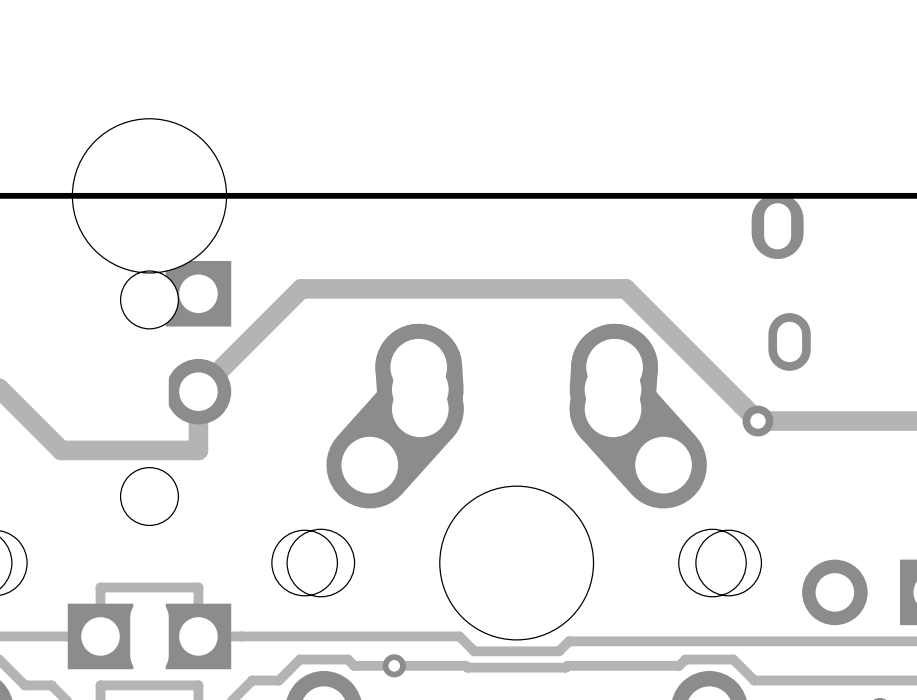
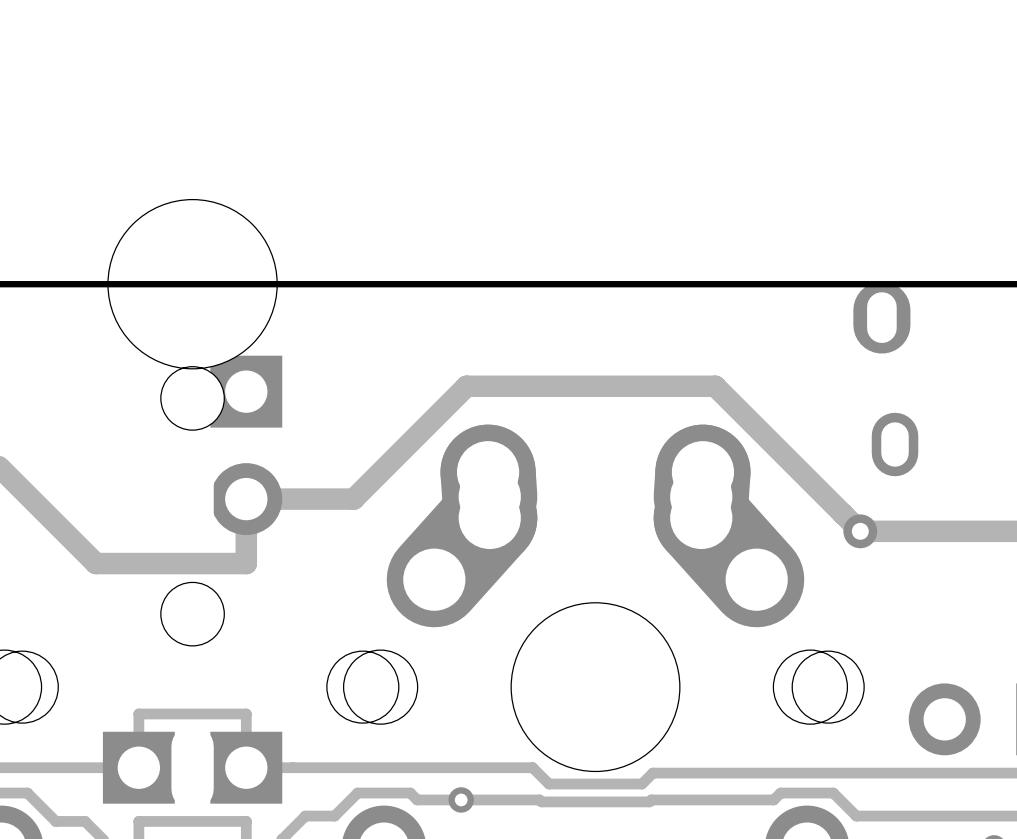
track: (399, 288) (301, 288) (198, 391) -> (466, 386) (353, 499) (246, 499)

